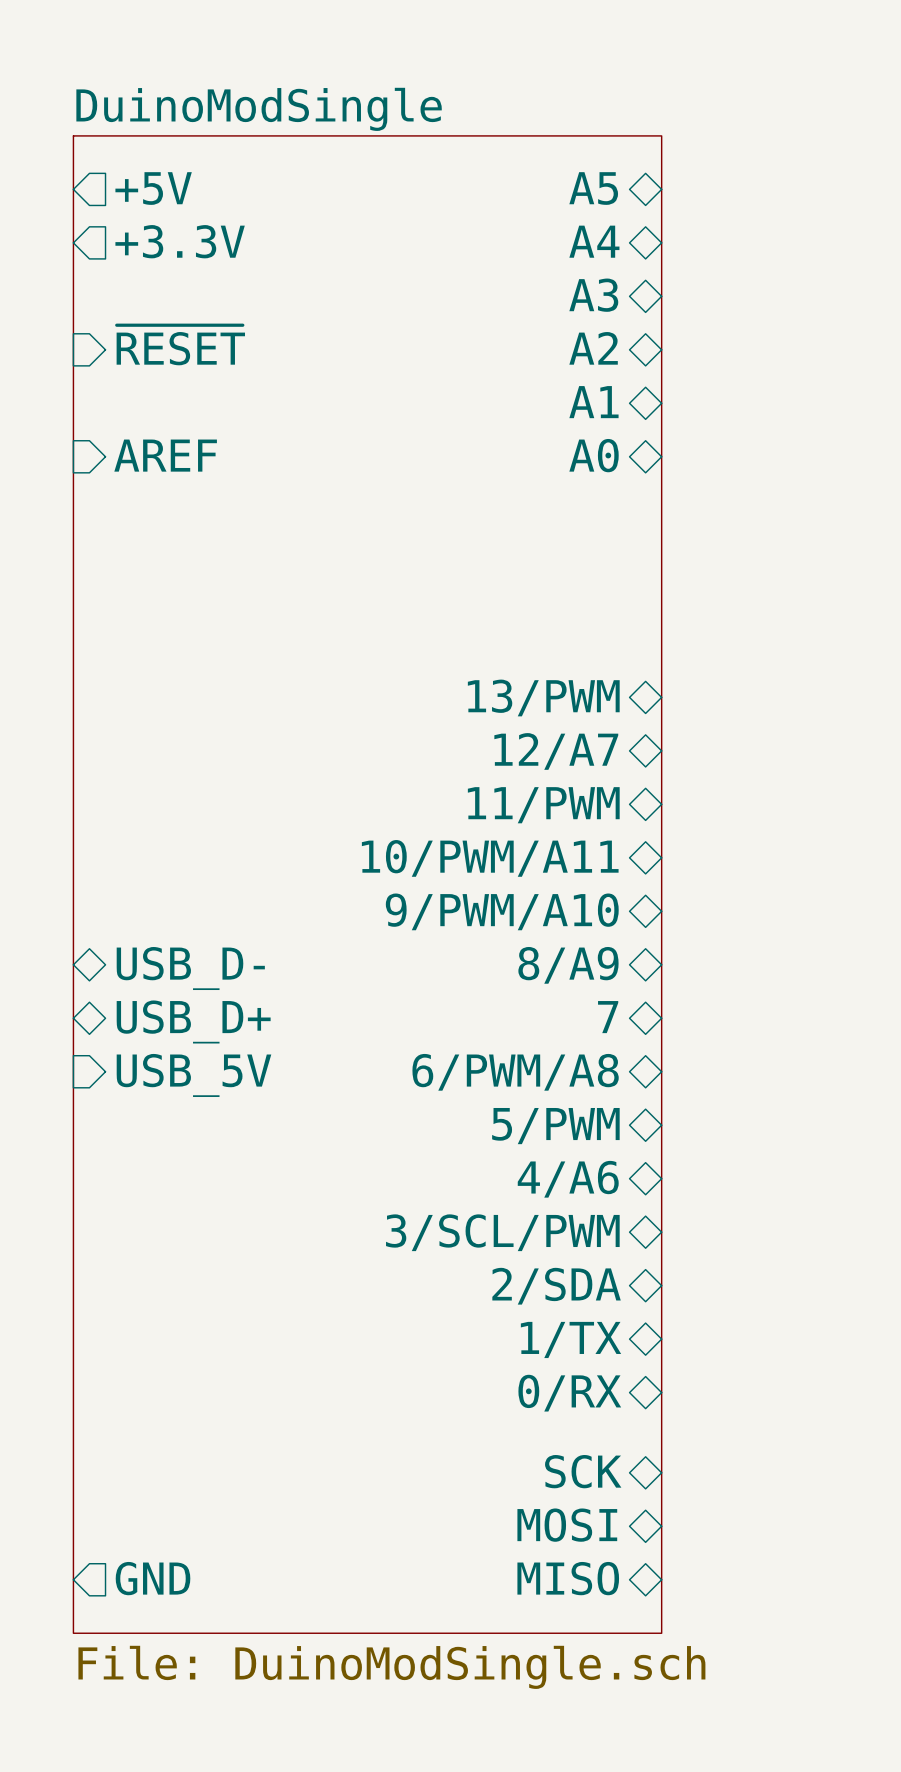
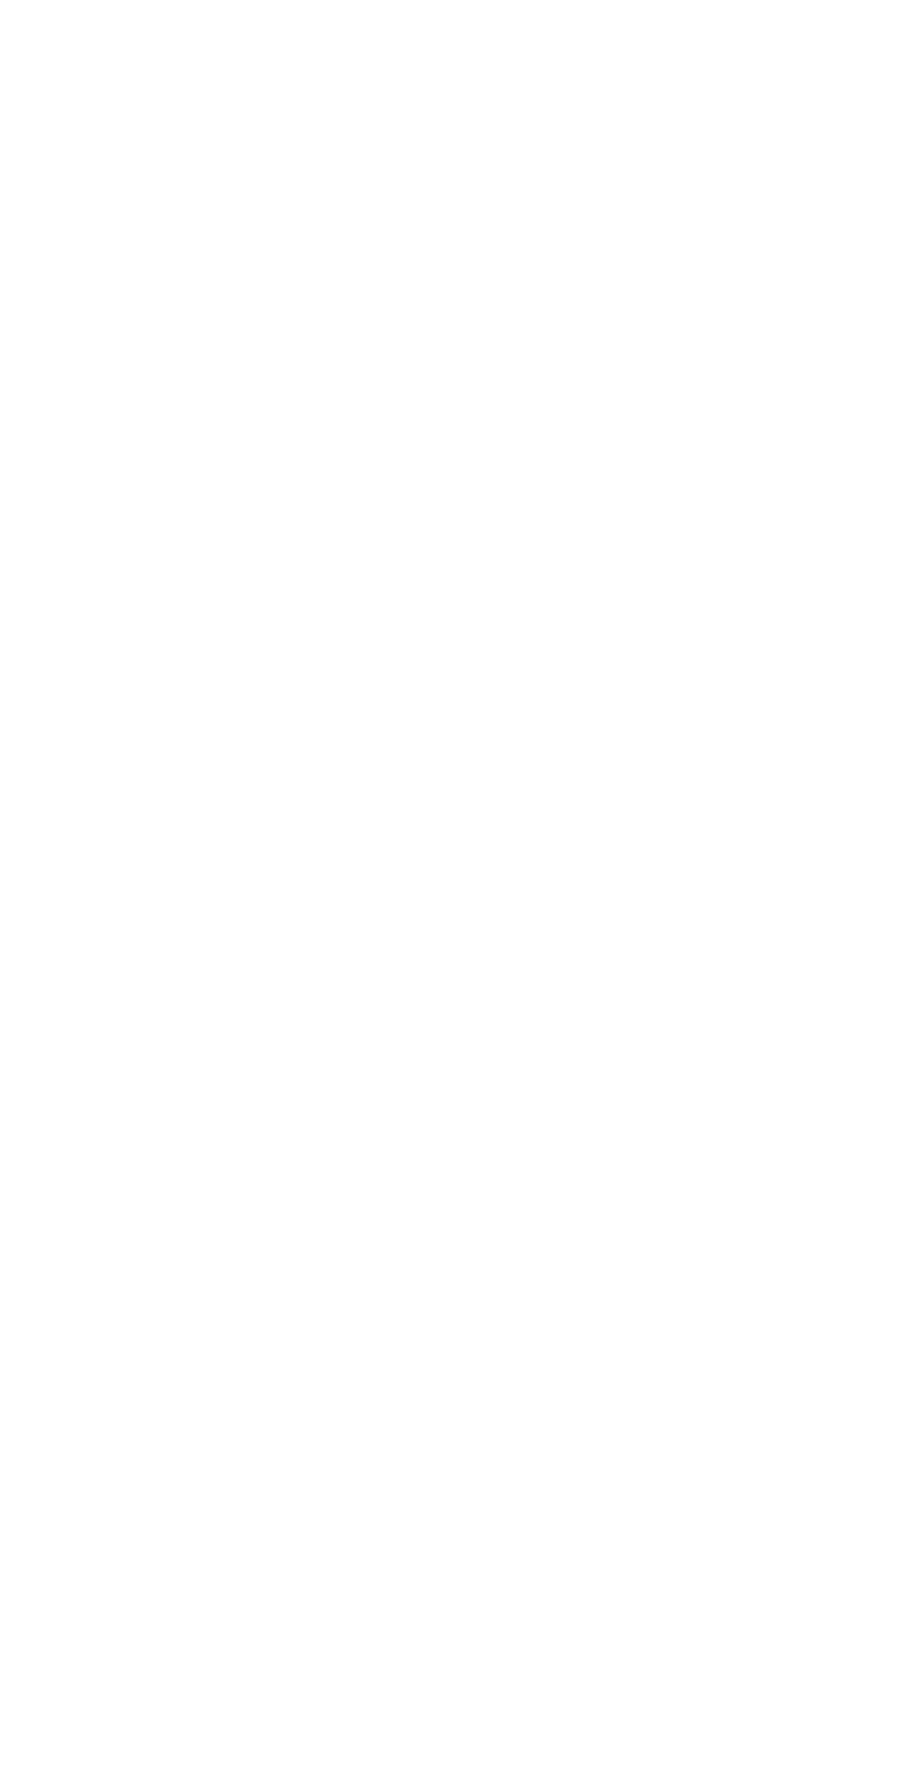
sheet pin: +5V (153, 188) -> none
sheet pin: A5 (593, 188) -> none
sheet pin: +3.3V (180, 241) -> none
sheet pin: A4 (594, 241) -> none
sheet pin: A3 (593, 295) -> none
sheet pin: ~{RESET} (180, 345) -> none
sheet pin: A2 (593, 348) -> none
sheet pin: A1 (593, 402) -> none
sheet pin: AREF (165, 455) -> none
sheet pin: A0 (594, 455) -> none
sheet pin: 13/PWM (543, 697) -> none
sheet pin: 12/A7 (556, 751) -> none
sheet pin: 11/PWM (543, 805) -> none
sheet pin: 10/PWM/A11 (490, 858) -> none
sheet DuinoModSingle: File: DuinoModSingle.sch (367, 884) -> none
sheet pin: 9/PWM/A10 (502, 911) -> none
sheet pin: 8/A9 (568, 965) -> none
sheet pin: USB_D- (190, 968) -> none
sheet pin: 7 (608, 1017) -> none
sheet pin: USB_D+ (193, 1021) -> none
sheet pin: 6/PWM/A8 (515, 1072) -> none
sheet pin: USB_5V (193, 1075) -> none
sheet pin: 5/PWM (555, 1126) -> none
sheet pin: 4/A6 (568, 1179) -> none
sheet pin: 3/SCL/PWM (502, 1232) -> none
sheet pin: 2/SDA (556, 1286) -> none
sheet pin: 1/TX (571, 1339) -> none
sheet pin: 0/RX (569, 1393) -> none
sheet pin: SCK (583, 1471) -> none
sheet pin: MOSI (567, 1525) -> none
sheet pin: GND (153, 1578) -> none
sheet pin: MISO (568, 1578) -> none

